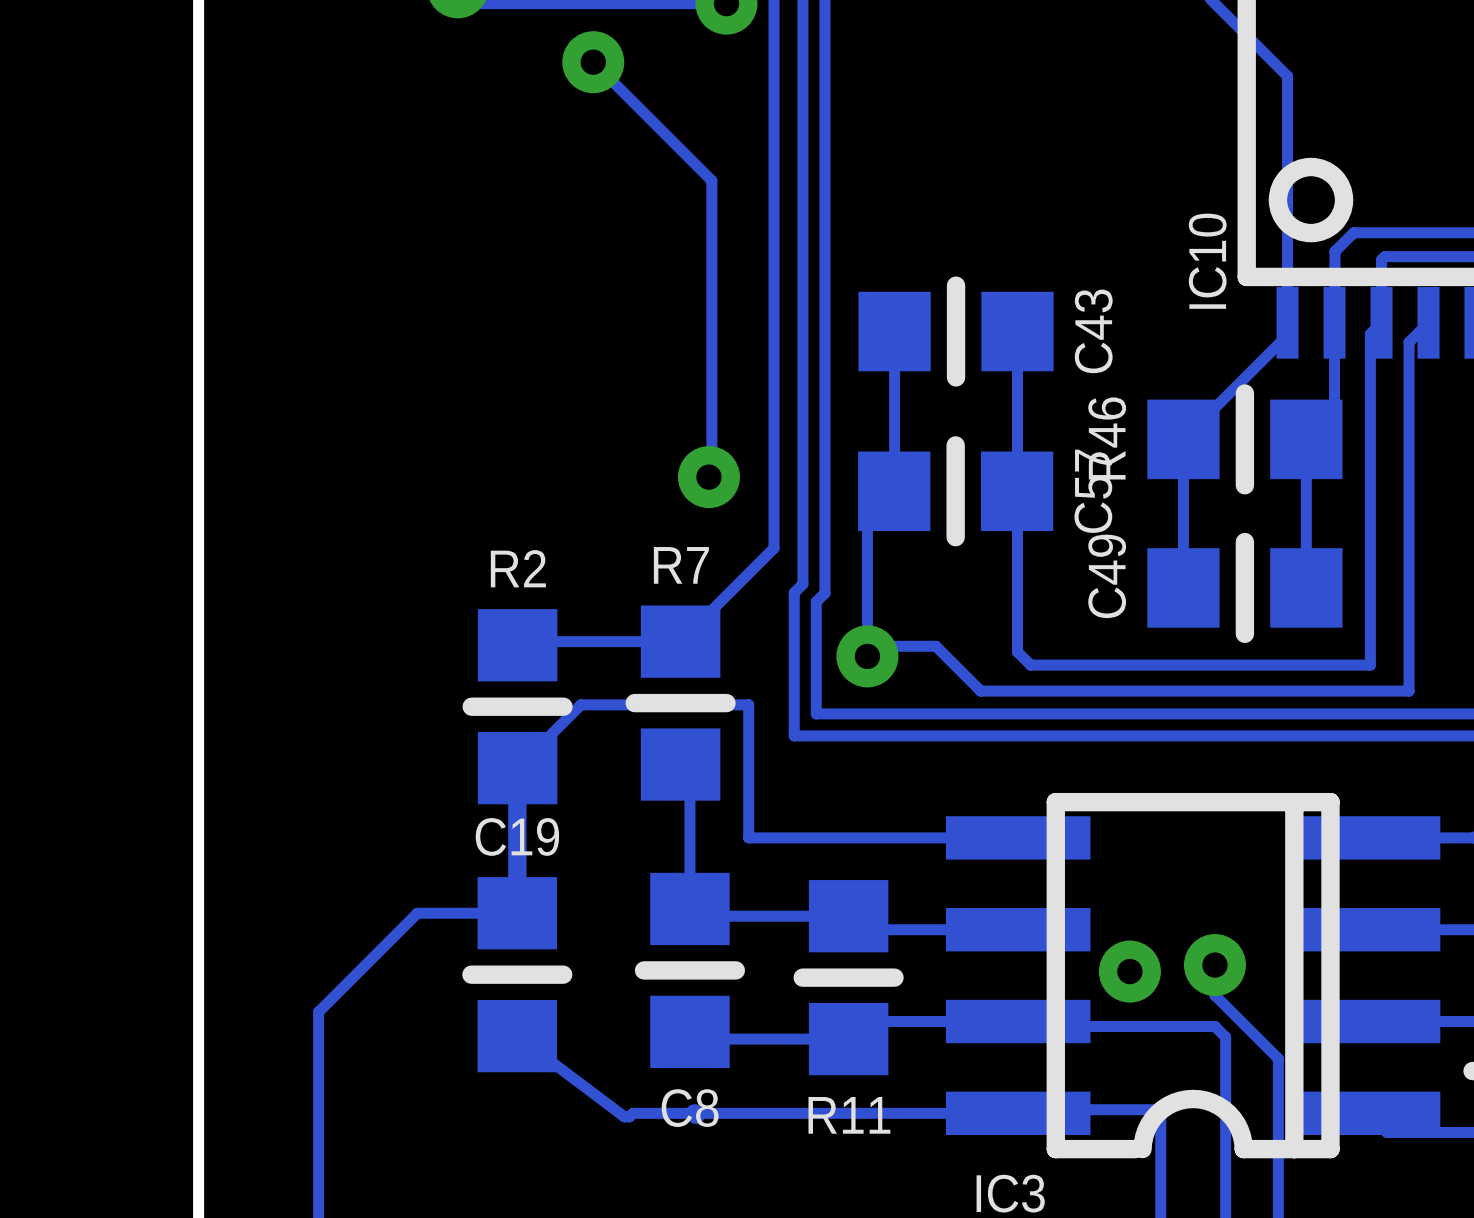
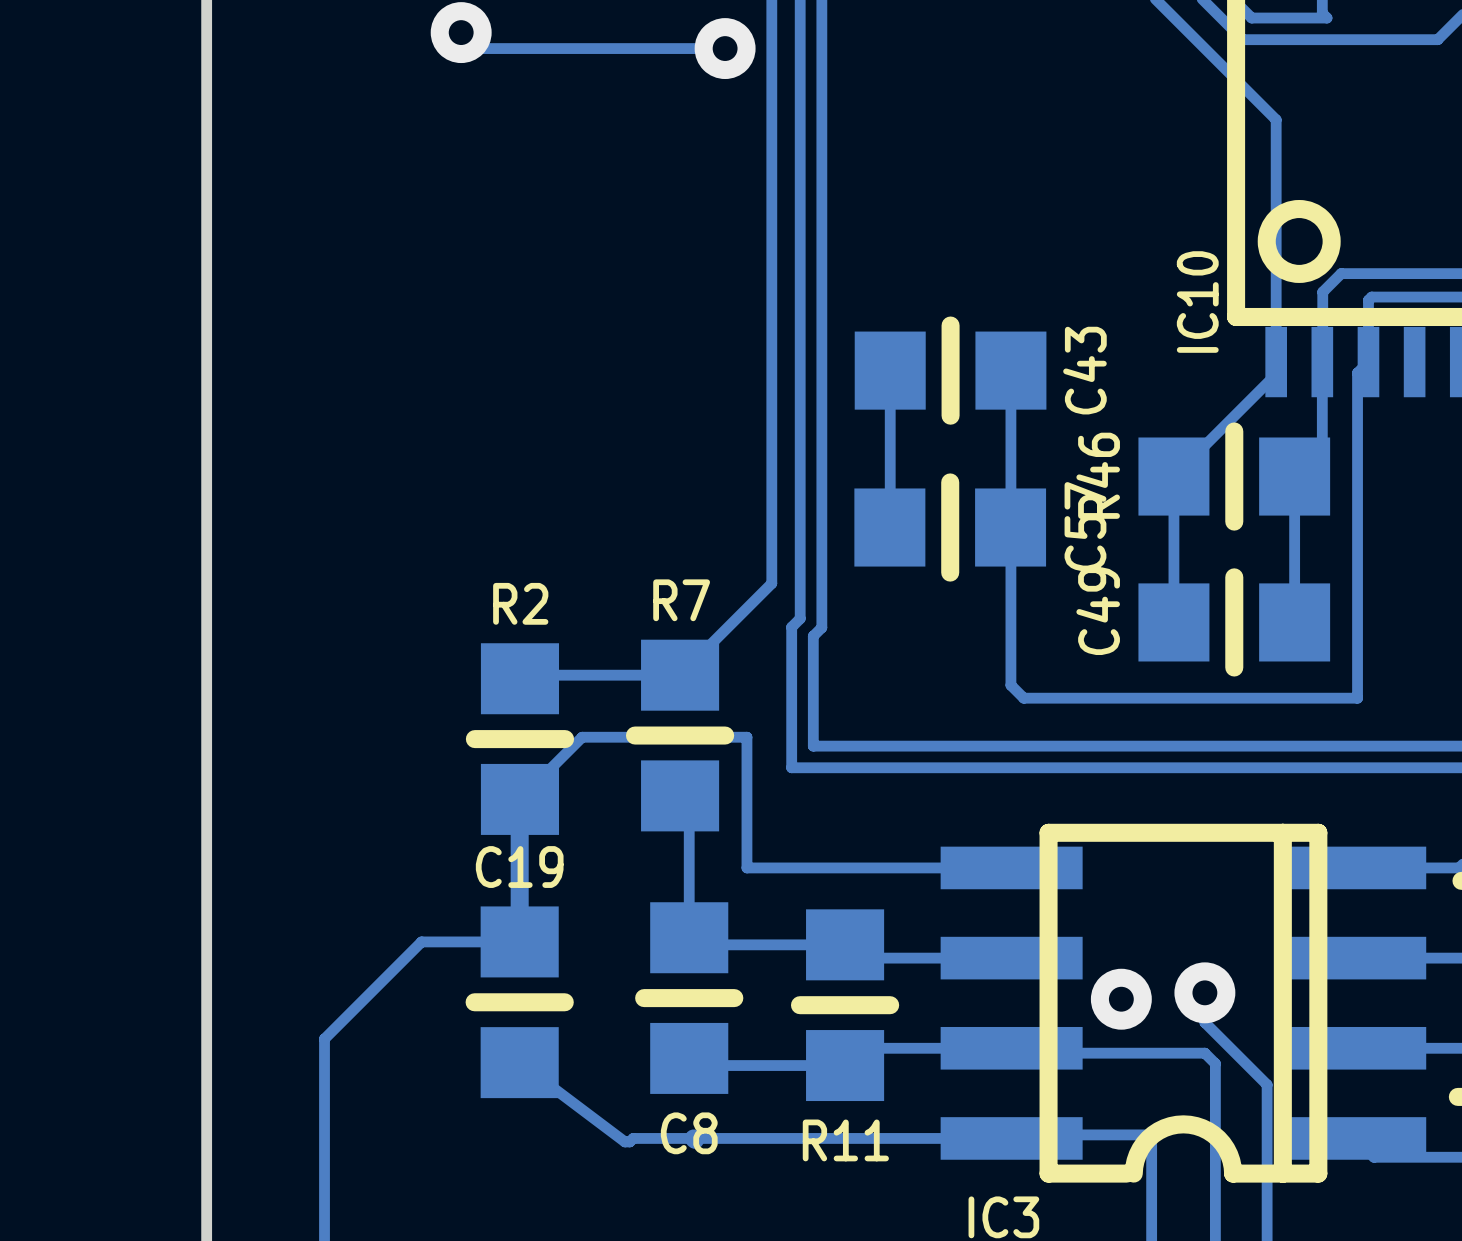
track: (593, 62) (711, 180) (711, 474) (708, 477) -> none
via: (593, 62) -> none
track: (1428, 322) (1409, 342) (1409, 691) (980, 691) (935, 646) (877, 646) (867, 656) (867, 518) (894, 491) -> none
via: (708, 477) -> none
via: (867, 656) -> none

